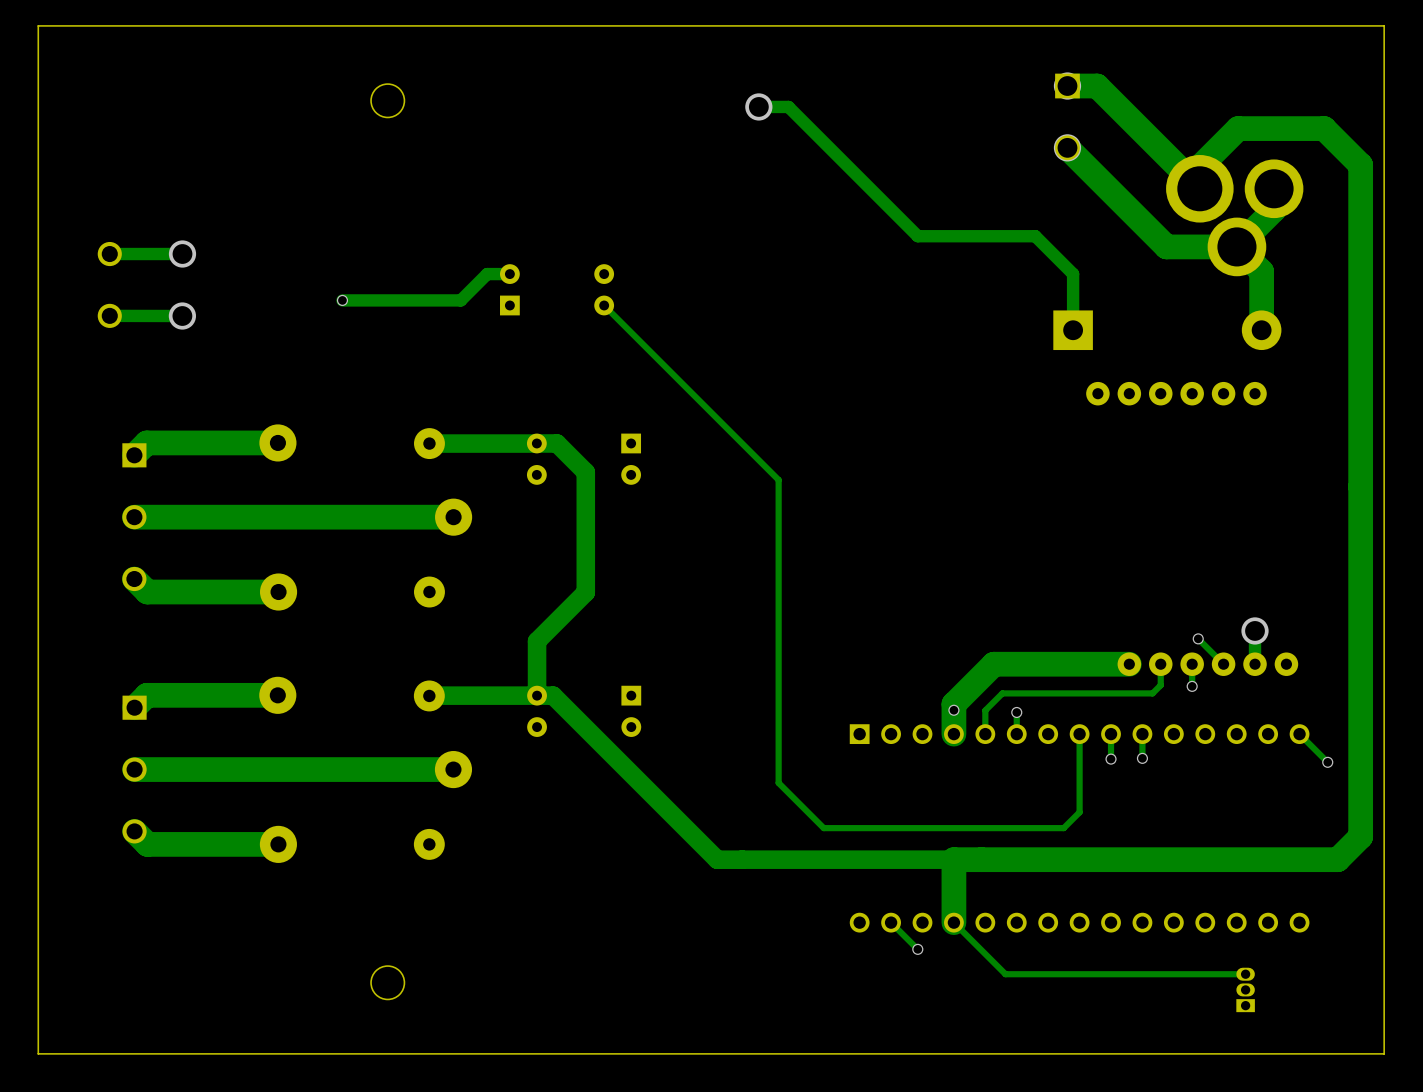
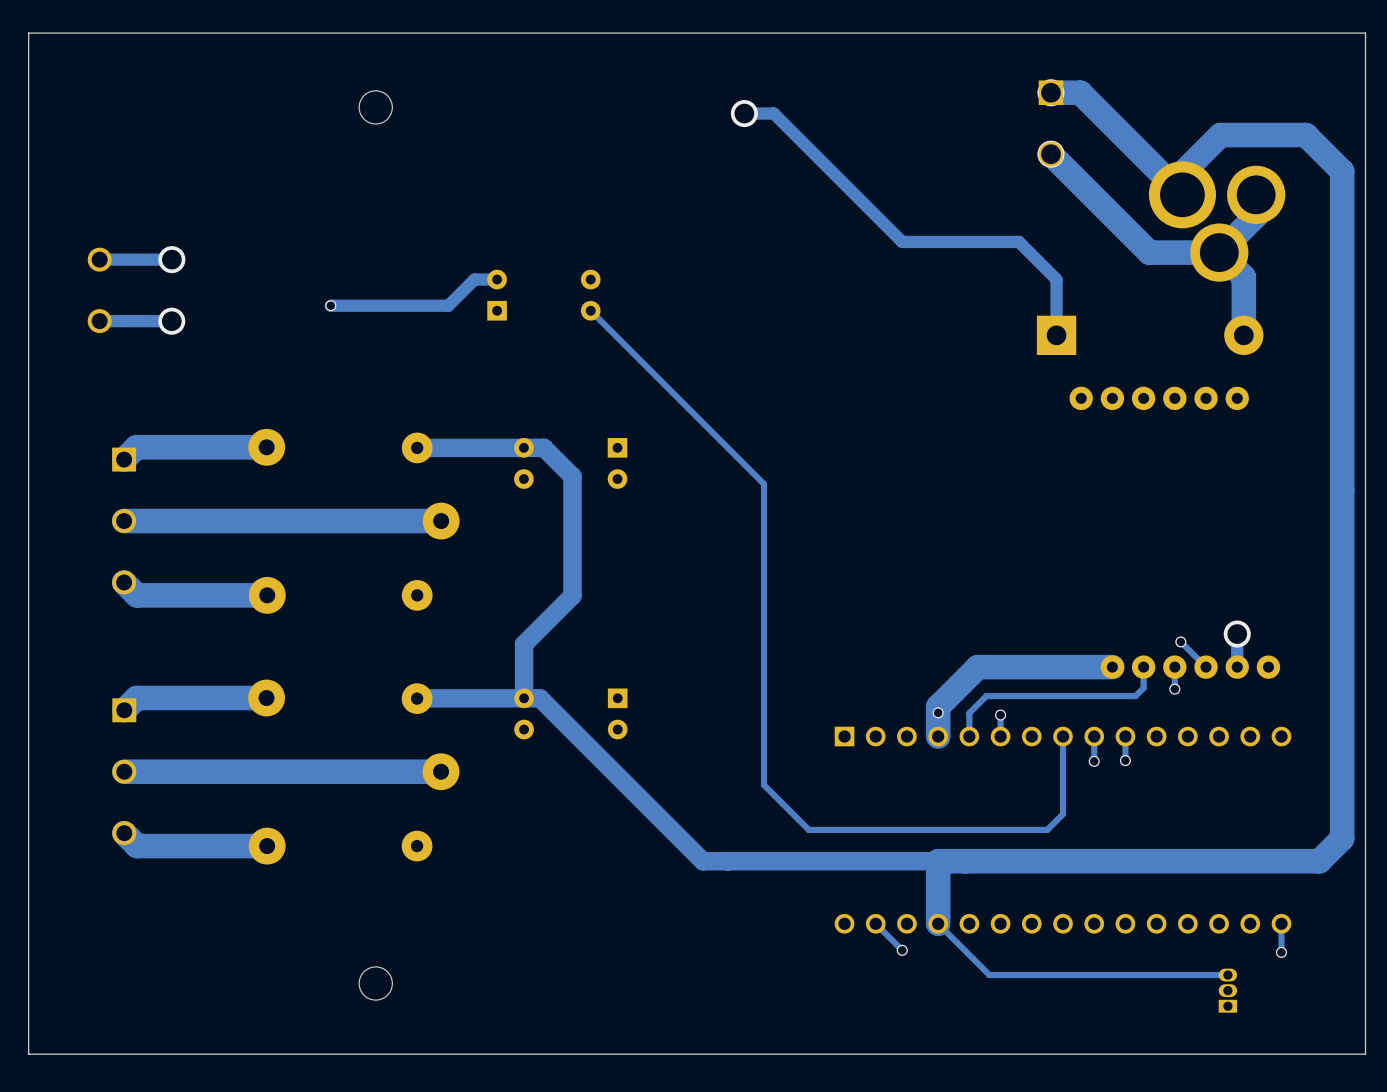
track: (1299, 734) (1327, 762) -> none
via: (1327, 762) -> none
track: none -> (1281, 923) (1281, 952)
via: none -> (1281, 952)

